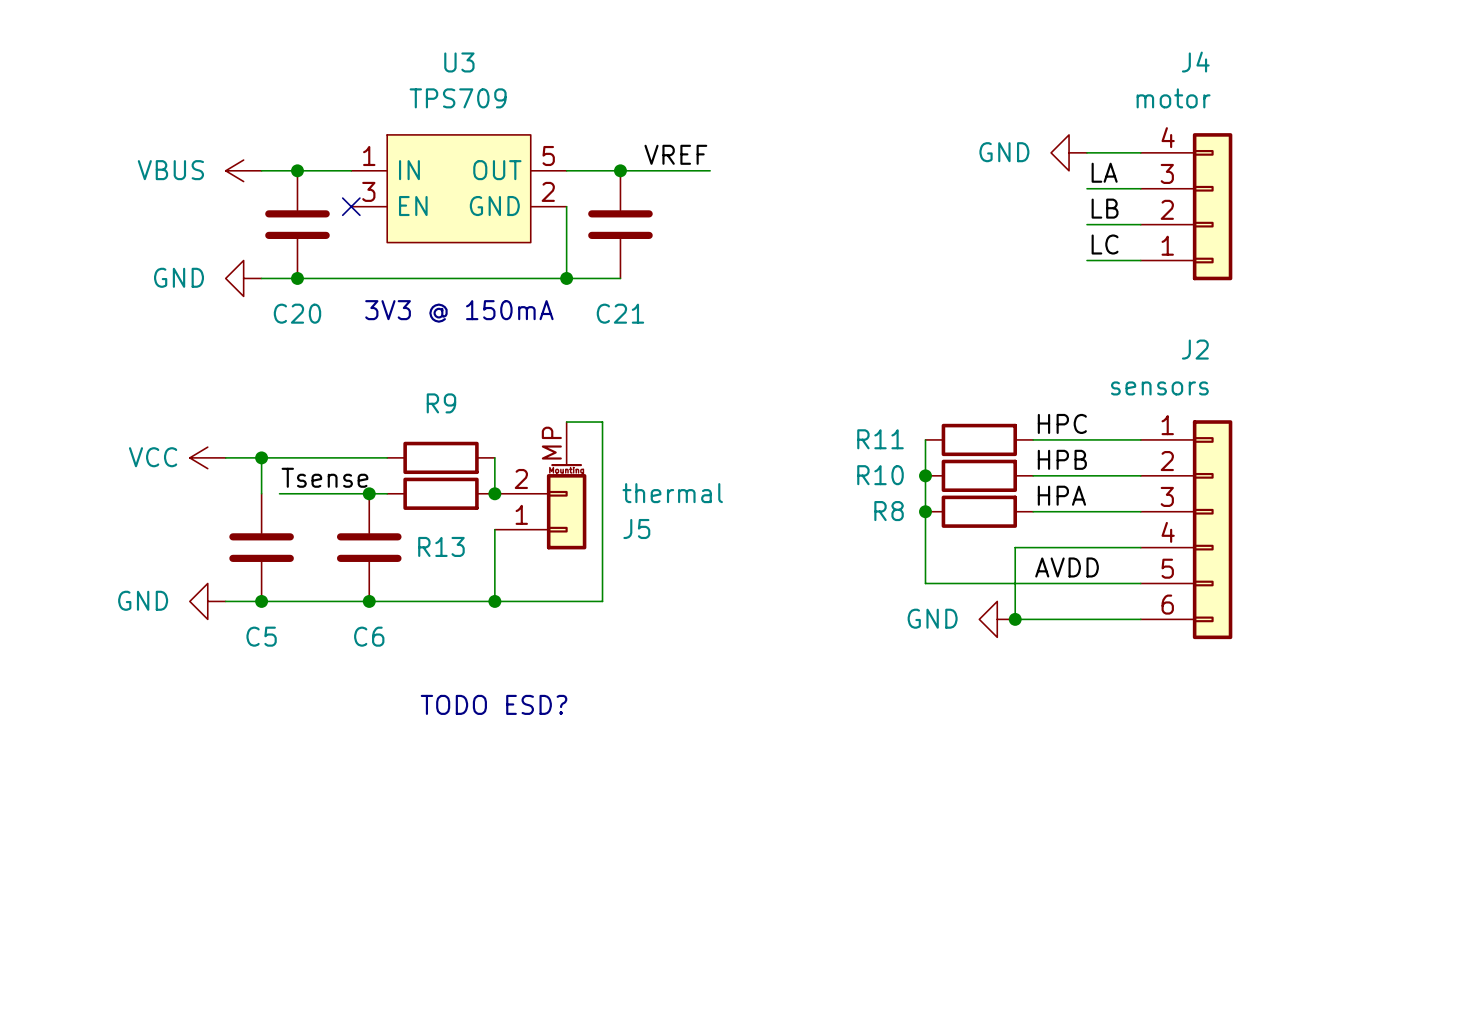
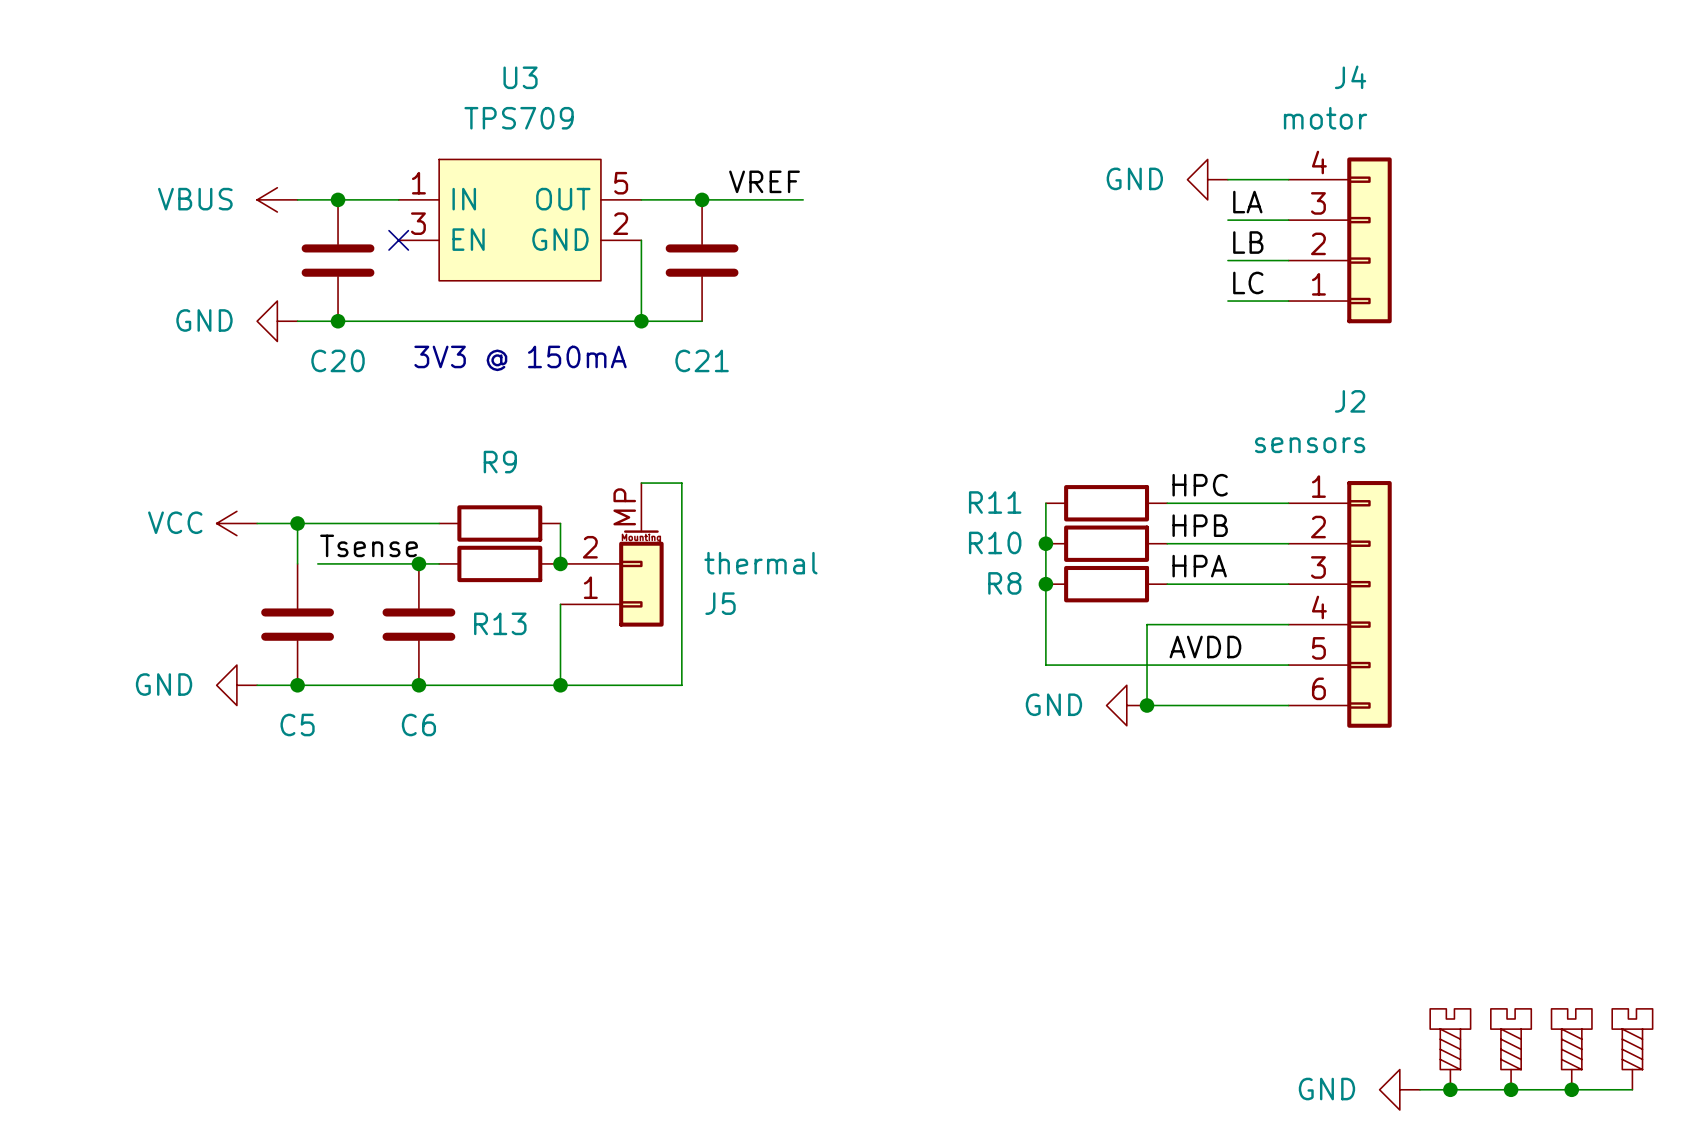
text: TODO ESD? (494, 704) -> none
part: none -> (1450, 1049)
part: none -> (1511, 1049)
part: none -> (1571, 1049)
part: none -> (1632, 1049)
power symbol: none -> GND (1399, 1089)
wire: none -> (1420, 1089) (1632, 1089)
junction: none -> (1450, 1089)
junction: none -> (1511, 1089)
junction: none -> (1571, 1089)

